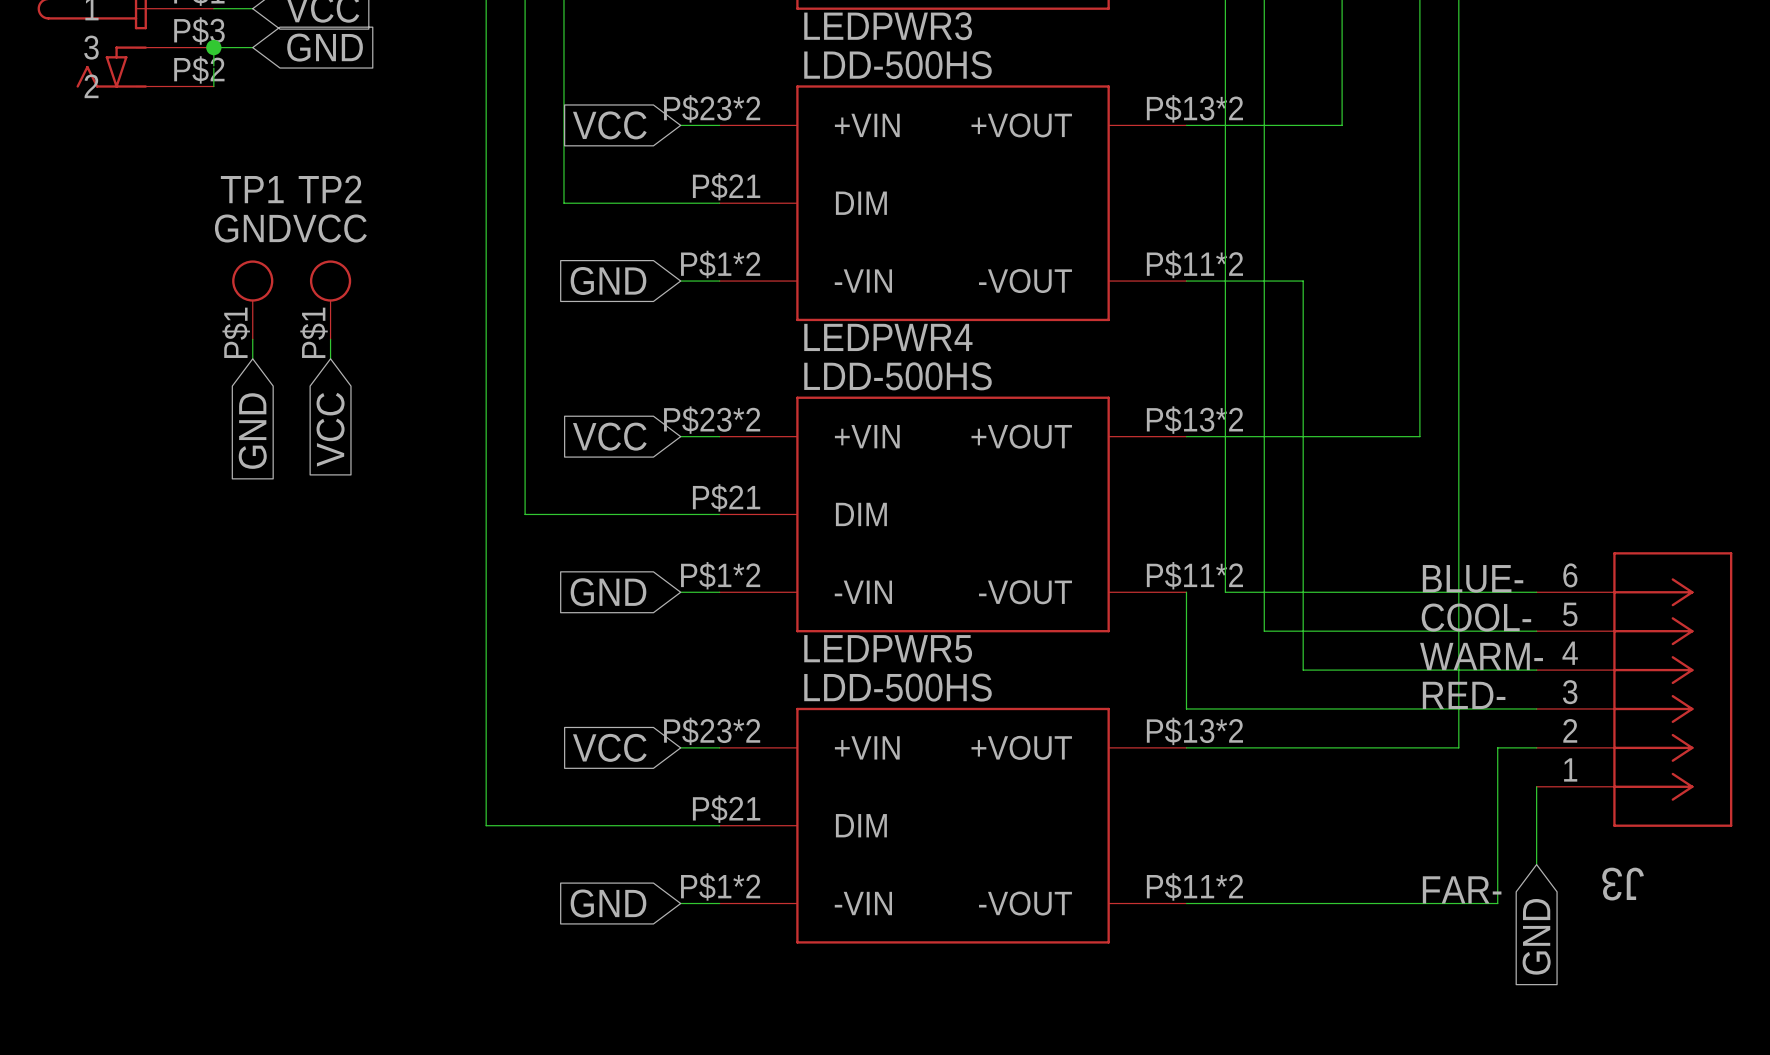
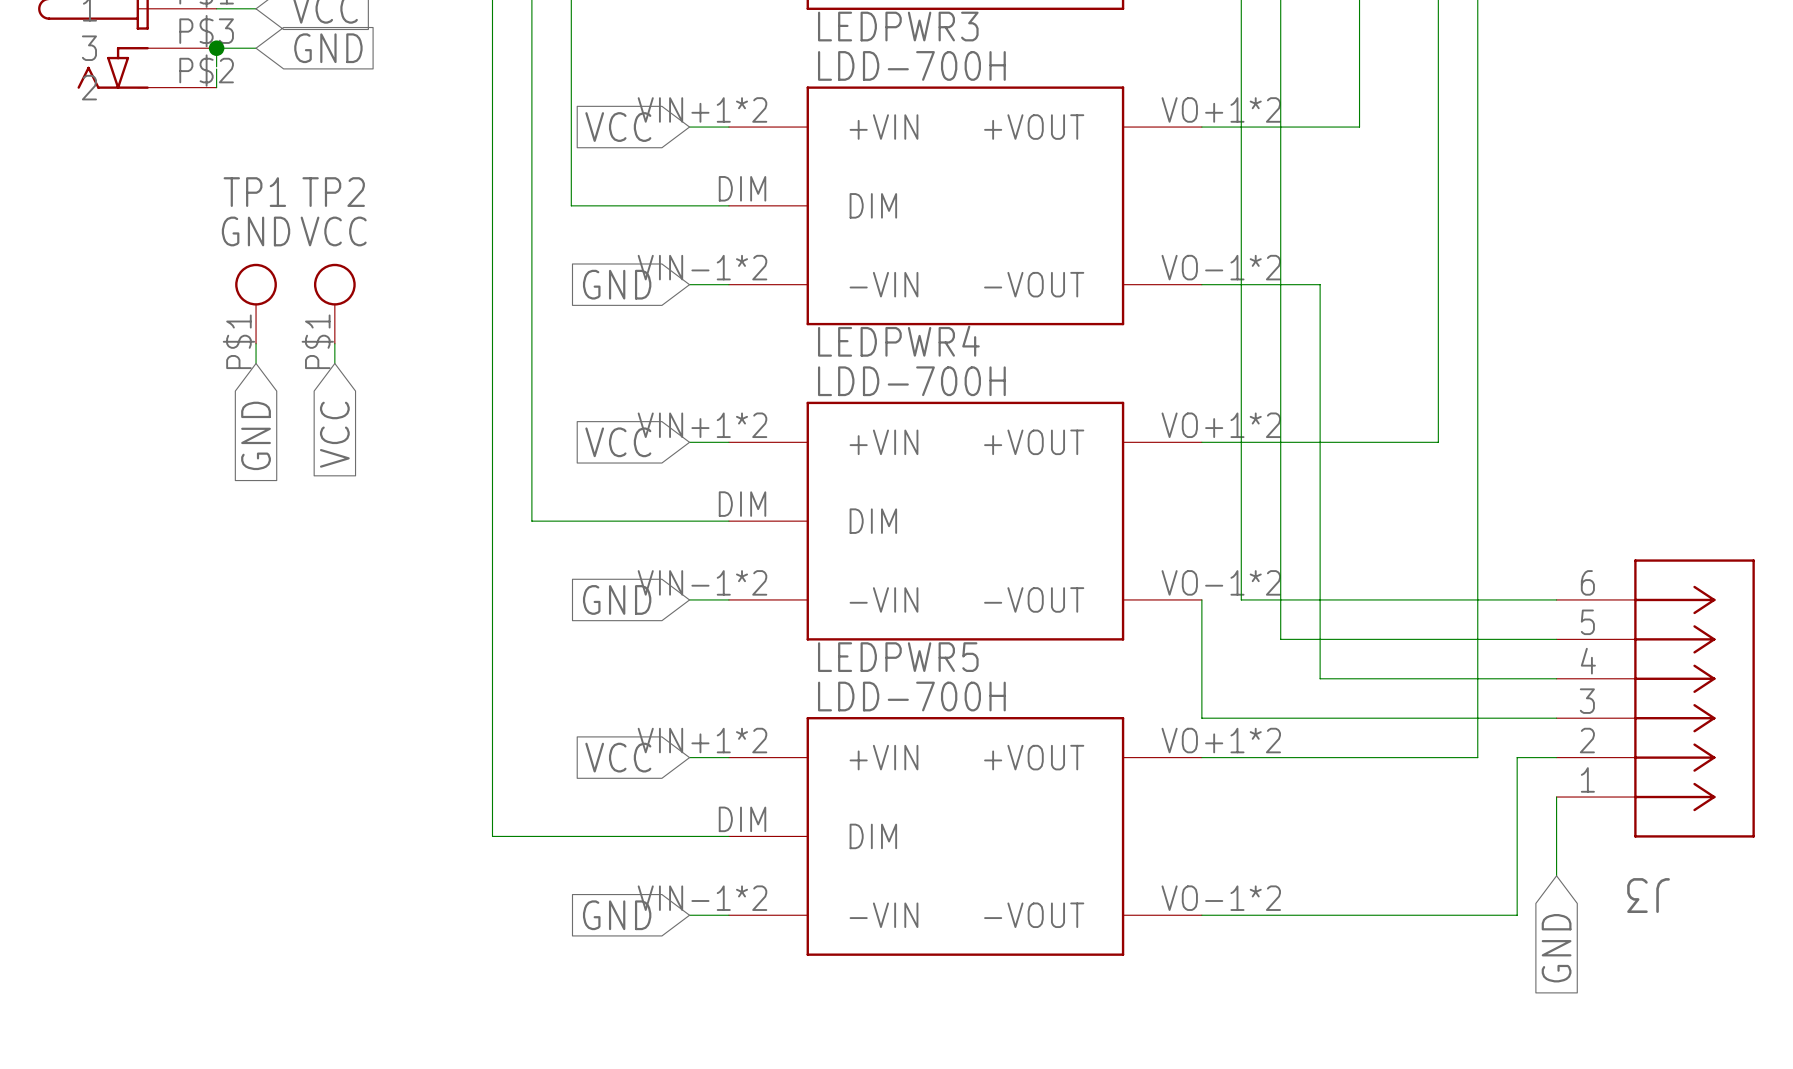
LEDPWR3 value: LDD-500HS (897, 65) -> LDD-700H (911, 65)
LEDPWR3 pin number: P$23*2 (712, 108) -> VIN+1*2 (702, 109)
LEDPWR3 pin number: P$13*2 (1194, 108) -> VO+1*2 (1221, 109)
LEDPWR3 pin number: P$21 (726, 186) -> DIM (742, 188)
LEDPWR3 pin number: P$1*2 (720, 264) -> VIN-1*2 (702, 267)
LEDPWR3 pin number: P$11*2 (1194, 264) -> VO-1*2 (1221, 267)
LEDPWR4 value: LDD-500HS (897, 376) -> LDD-700H (911, 381)
LEDPWR4 pin number: P$23*2 (712, 420) -> VIN+1*2 (702, 425)
LEDPWR4 pin number: P$13*2 (1194, 420) -> VO+1*2 (1221, 425)
LEDPWR4 pin number: P$21 (726, 497) -> DIM (742, 504)
LEDPWR4 pin number: P$1*2 (720, 575) -> VIN-1*2 (702, 582)
LEDPWR4 pin number: P$11*2 (1194, 575) -> VO-1*2 (1221, 582)
label: BLUE- (1473, 578) -> none
label: COOL- (1476, 617) -> none
label: WARM- (1481, 656) -> none
LEDPWR5 value: LDD-500HS (897, 687) -> LDD-700H (911, 696)
label: RED- (1464, 695) -> none
LEDPWR5 pin number: P$23*2 (712, 731) -> VIN+1*2 (702, 740)
LEDPWR5 pin number: P$13*2 (1194, 731) -> VO+1*2 (1221, 740)
LEDPWR5 pin number: P$21 (726, 809) -> DIM (742, 819)
LEDPWR5 pin number: P$1*2 (720, 886) -> VIN-1*2 (702, 898)
LEDPWR5 pin number: P$11*2 (1194, 886) -> VO-1*2 (1221, 898)
label: FAR- (1462, 889) -> none

